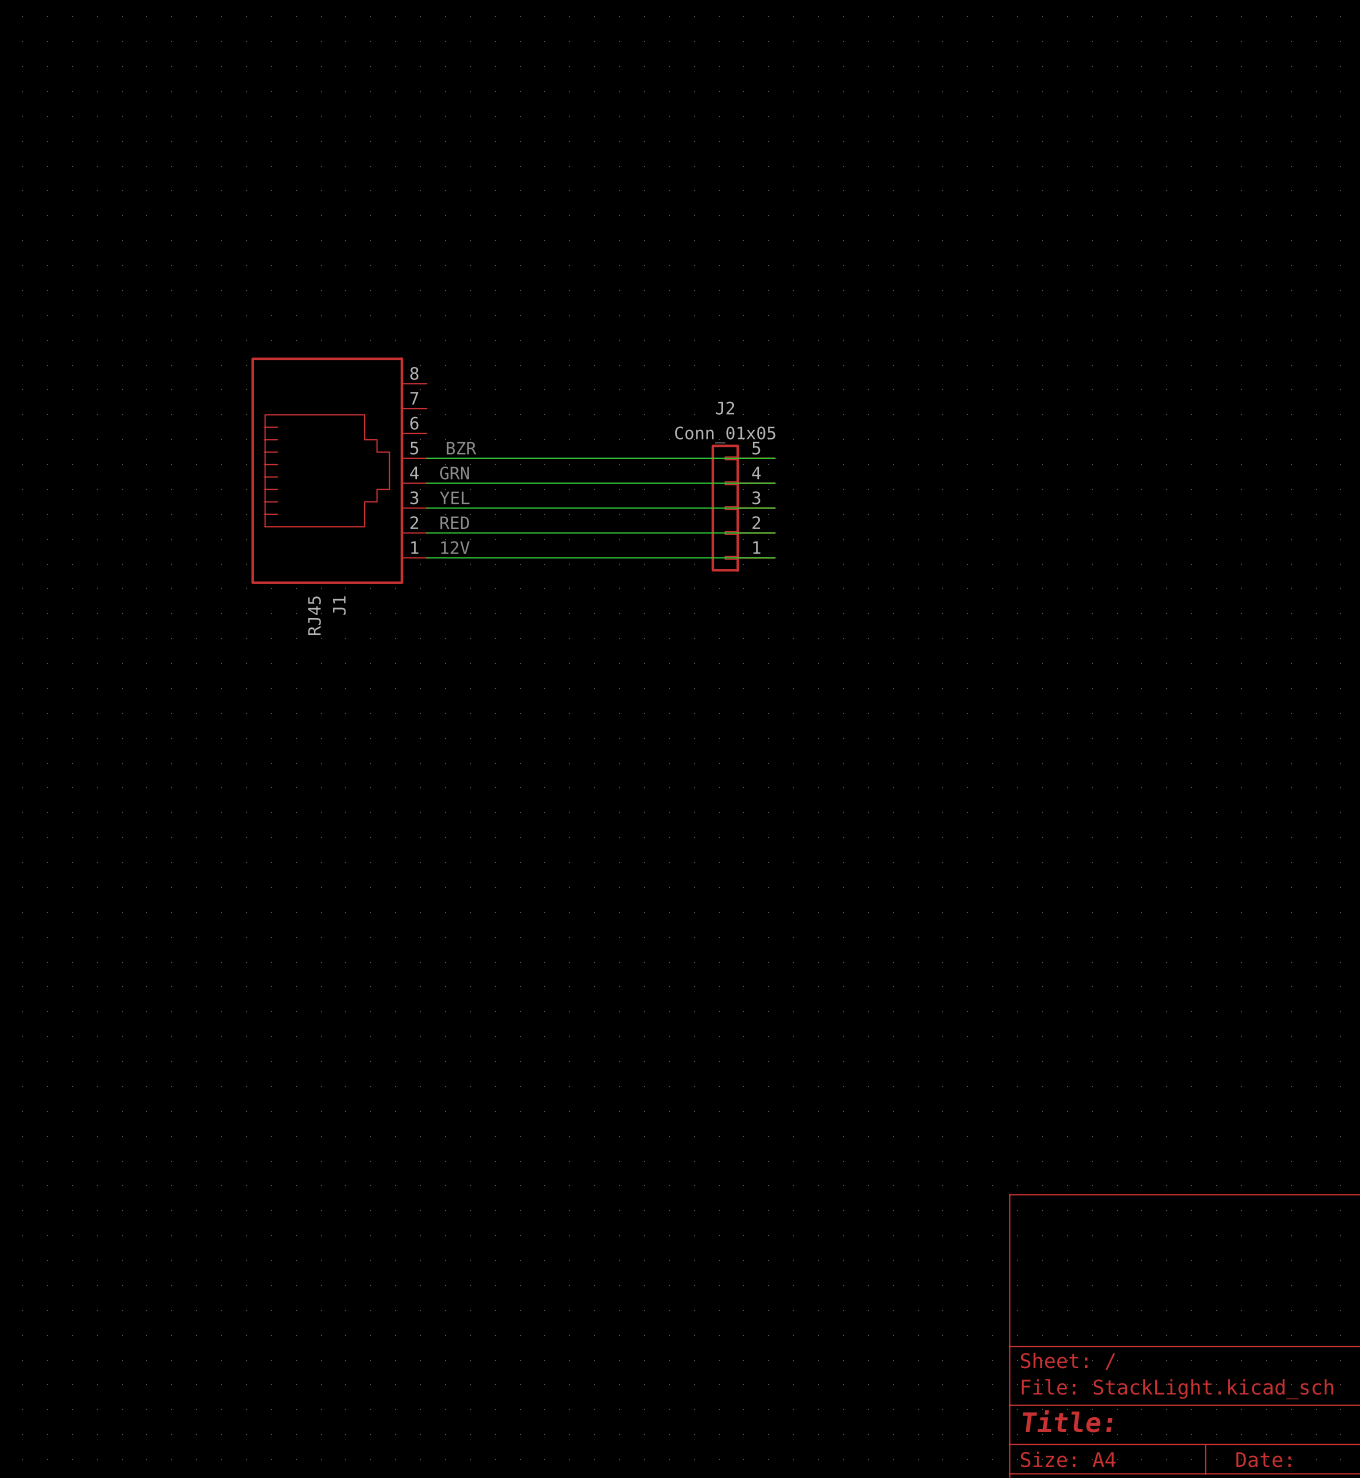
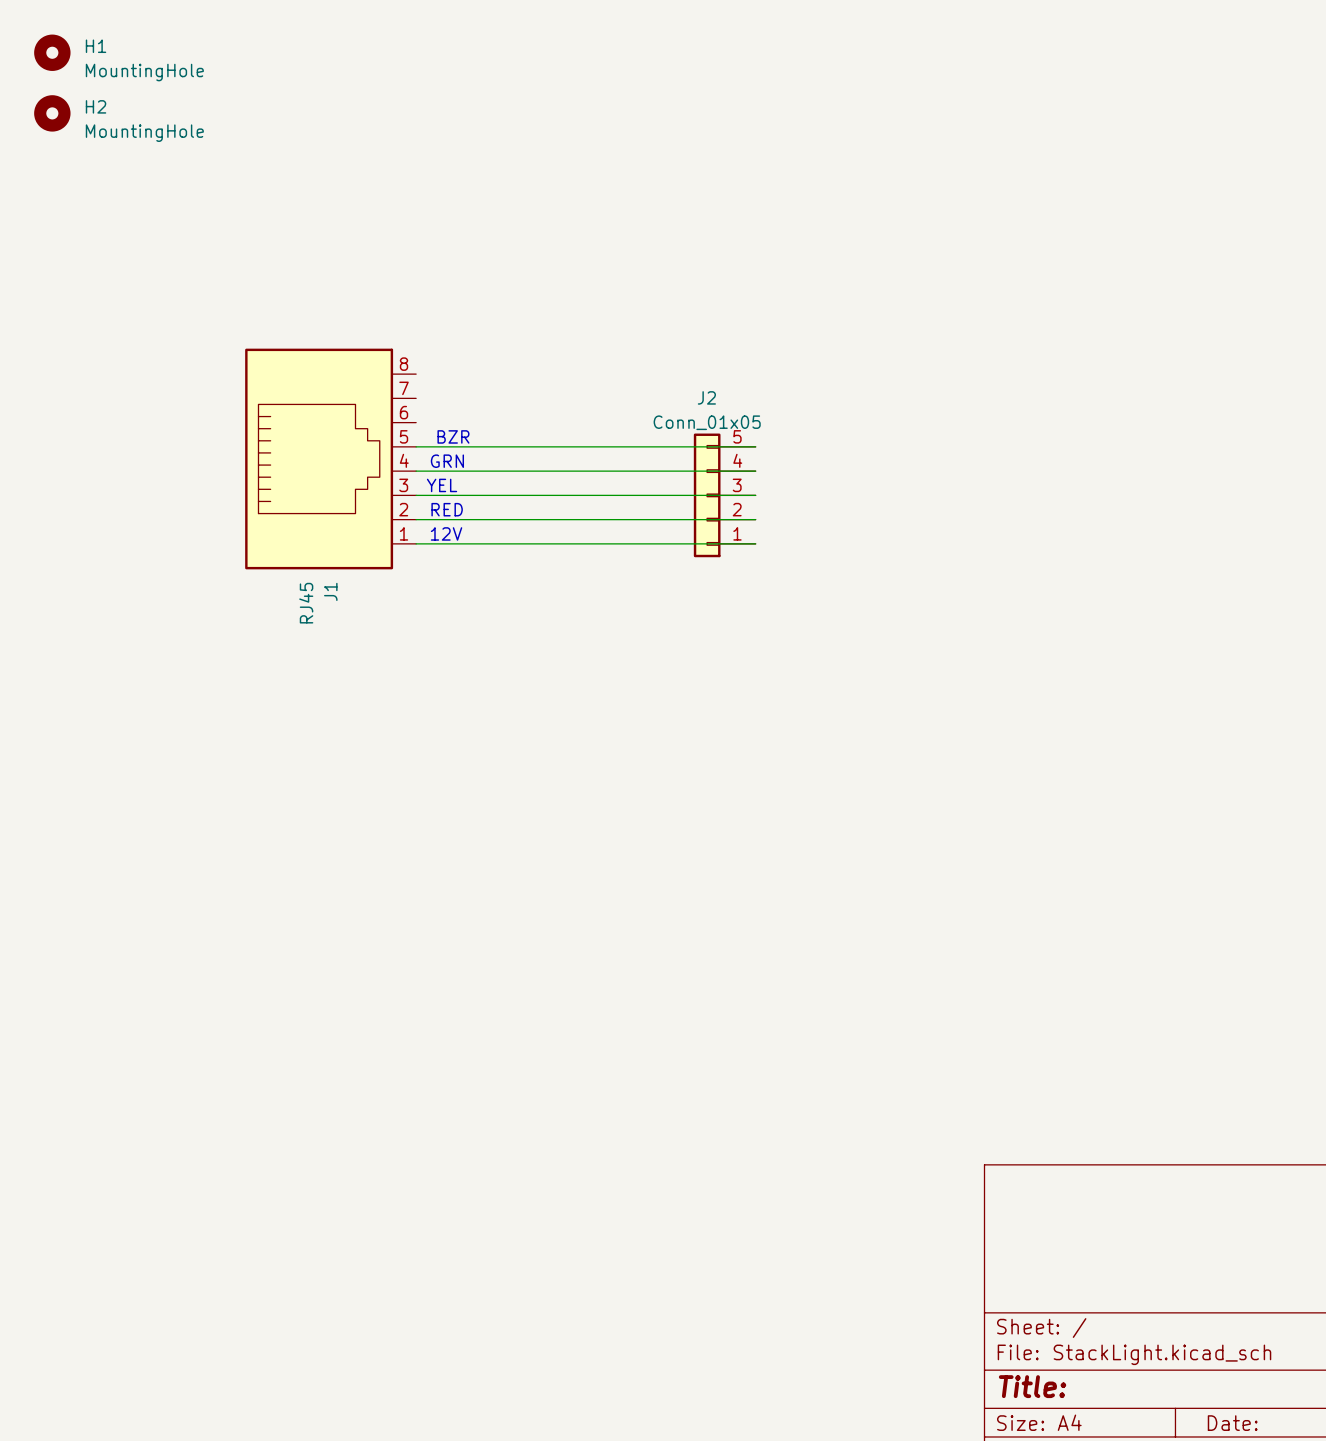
H1: none -> MountingHole (52, 52)
H2: none -> MountingHole (52, 113)

